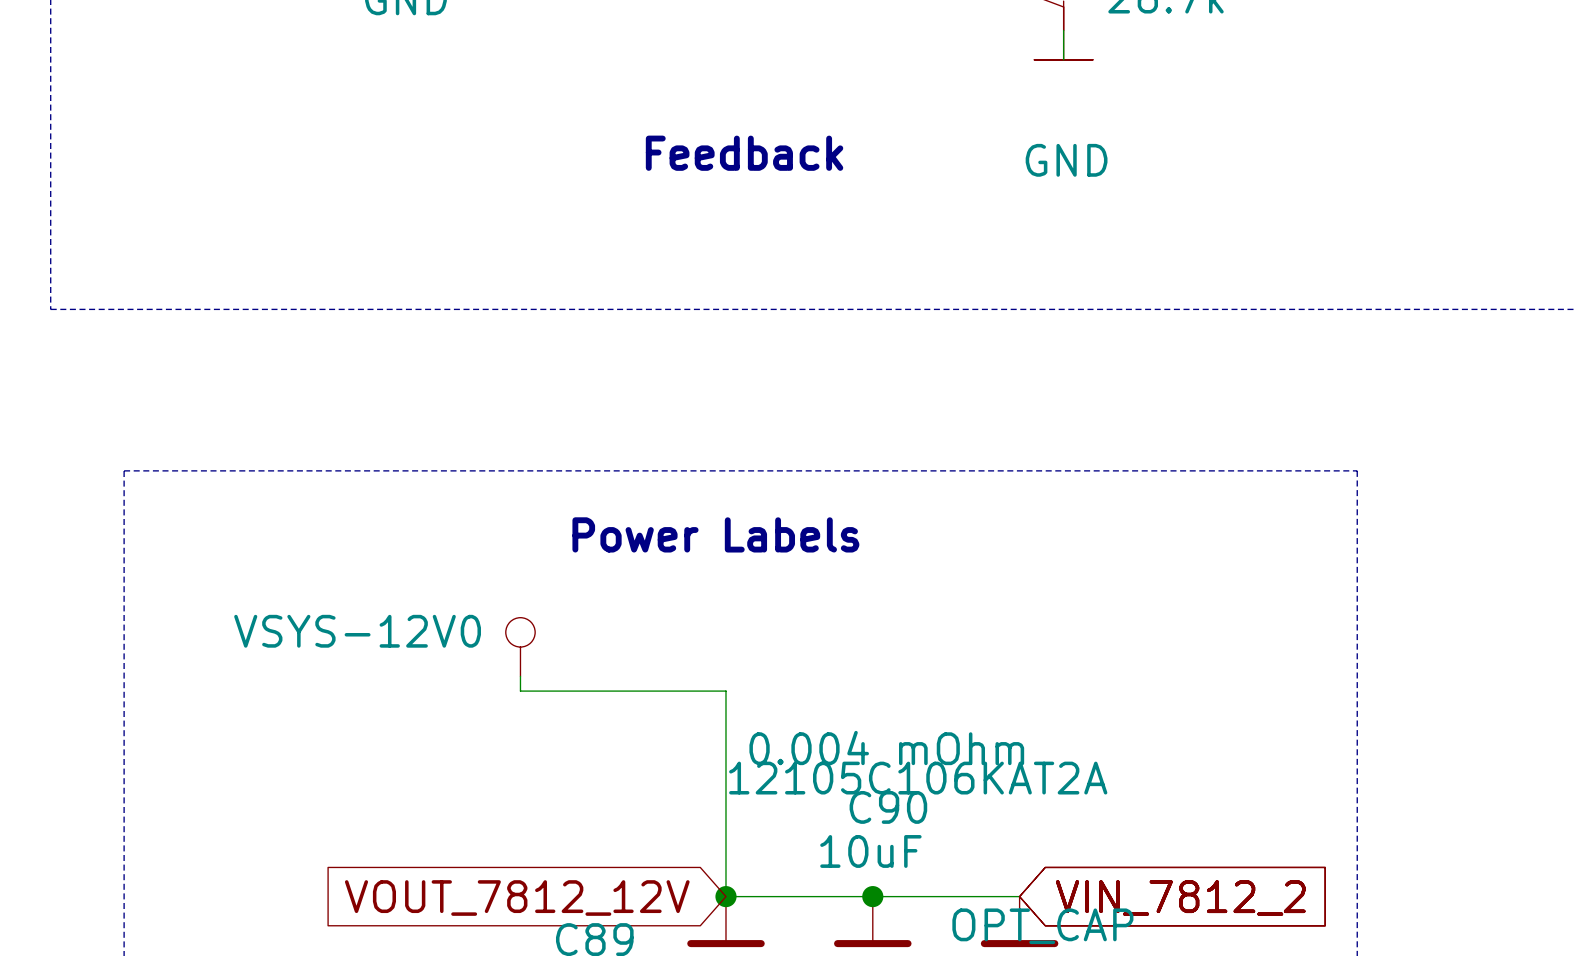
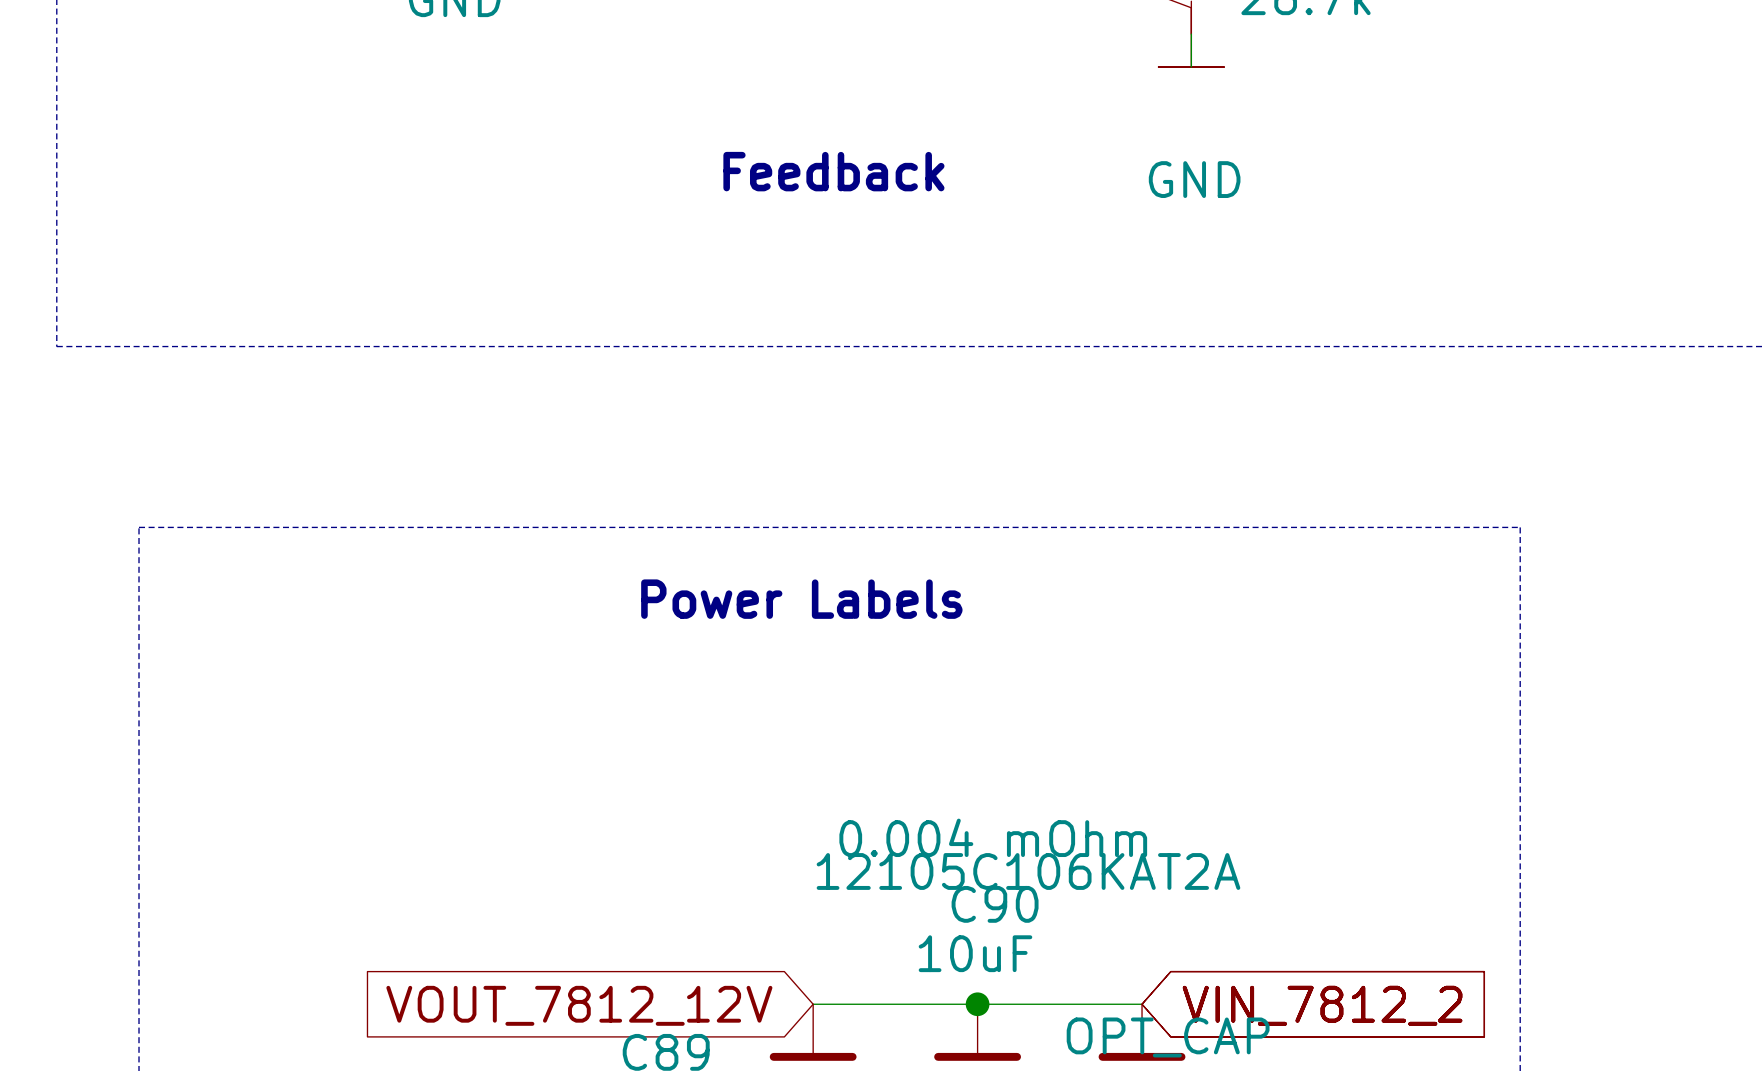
power symbol: VSYS-12V0 (520, 647) -> none
wire: (520, 676) (520, 691) (725, 691) (725, 896) -> none
junction: (725, 896) -> none

